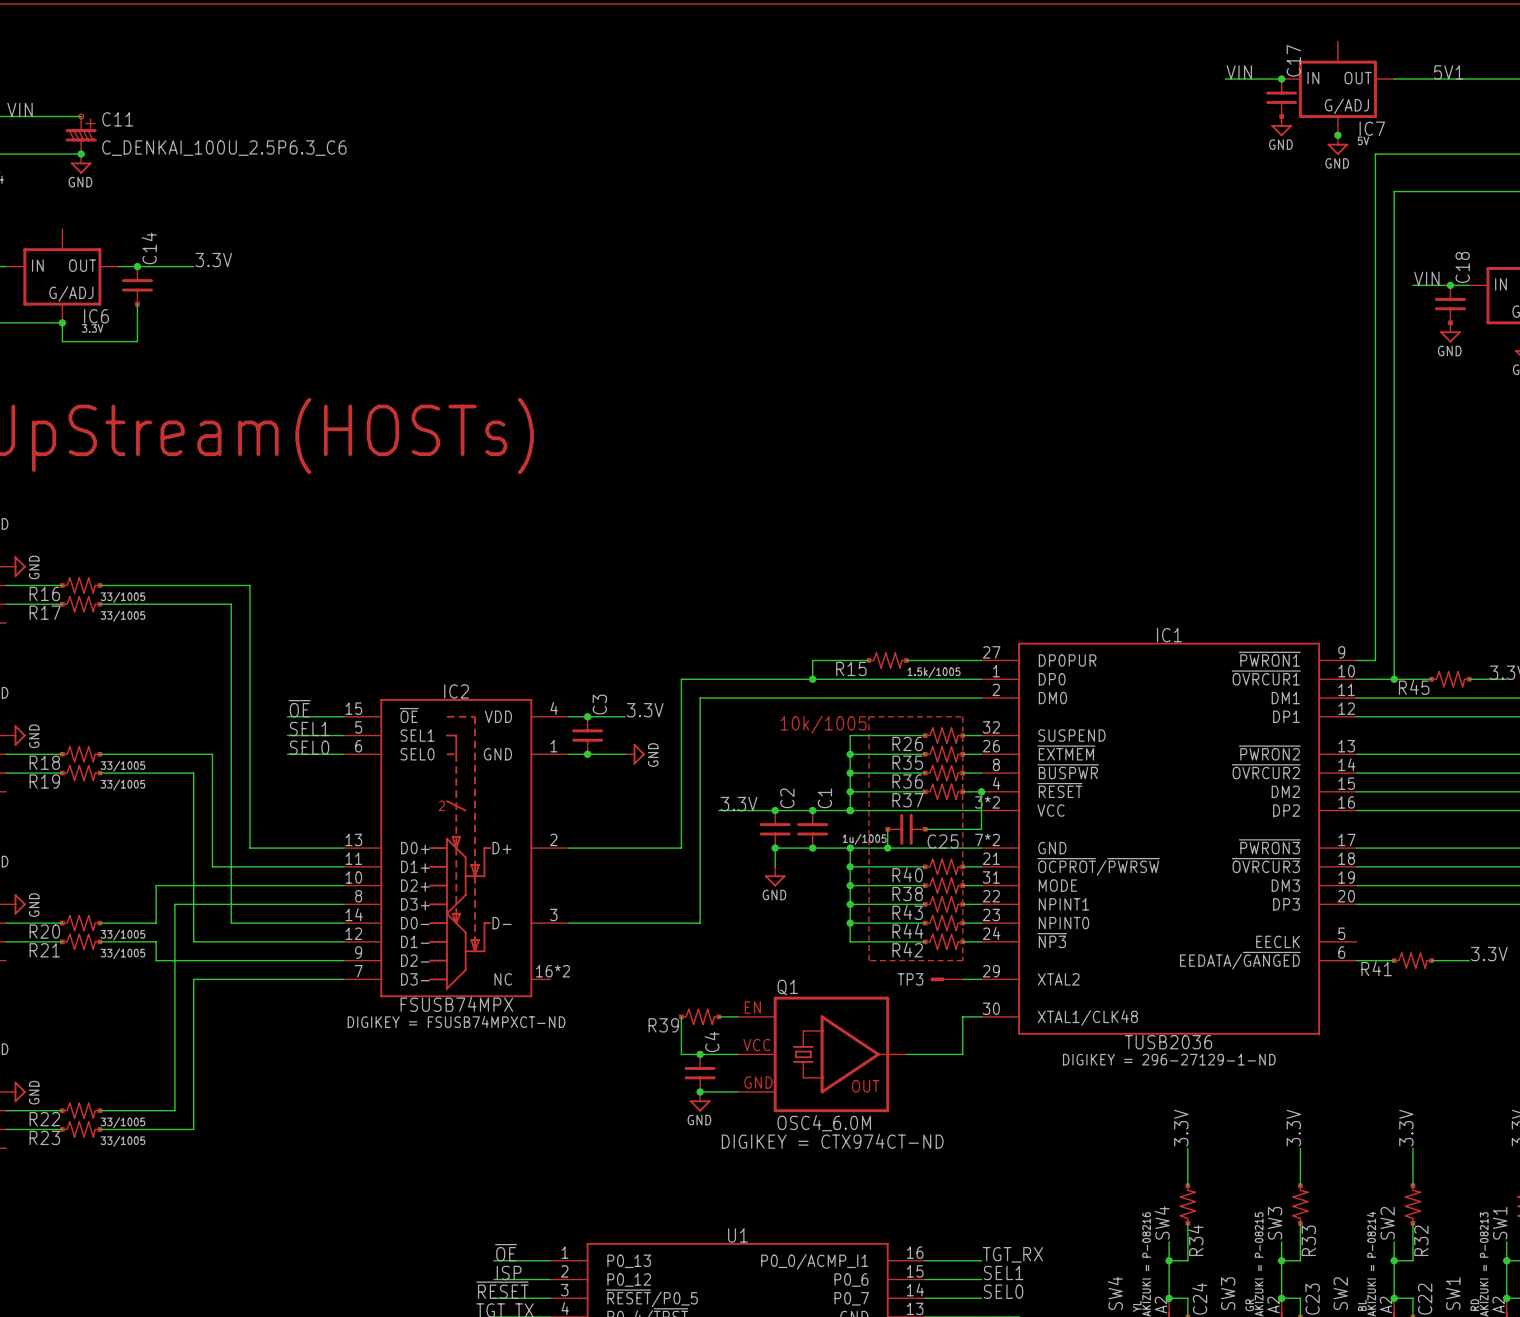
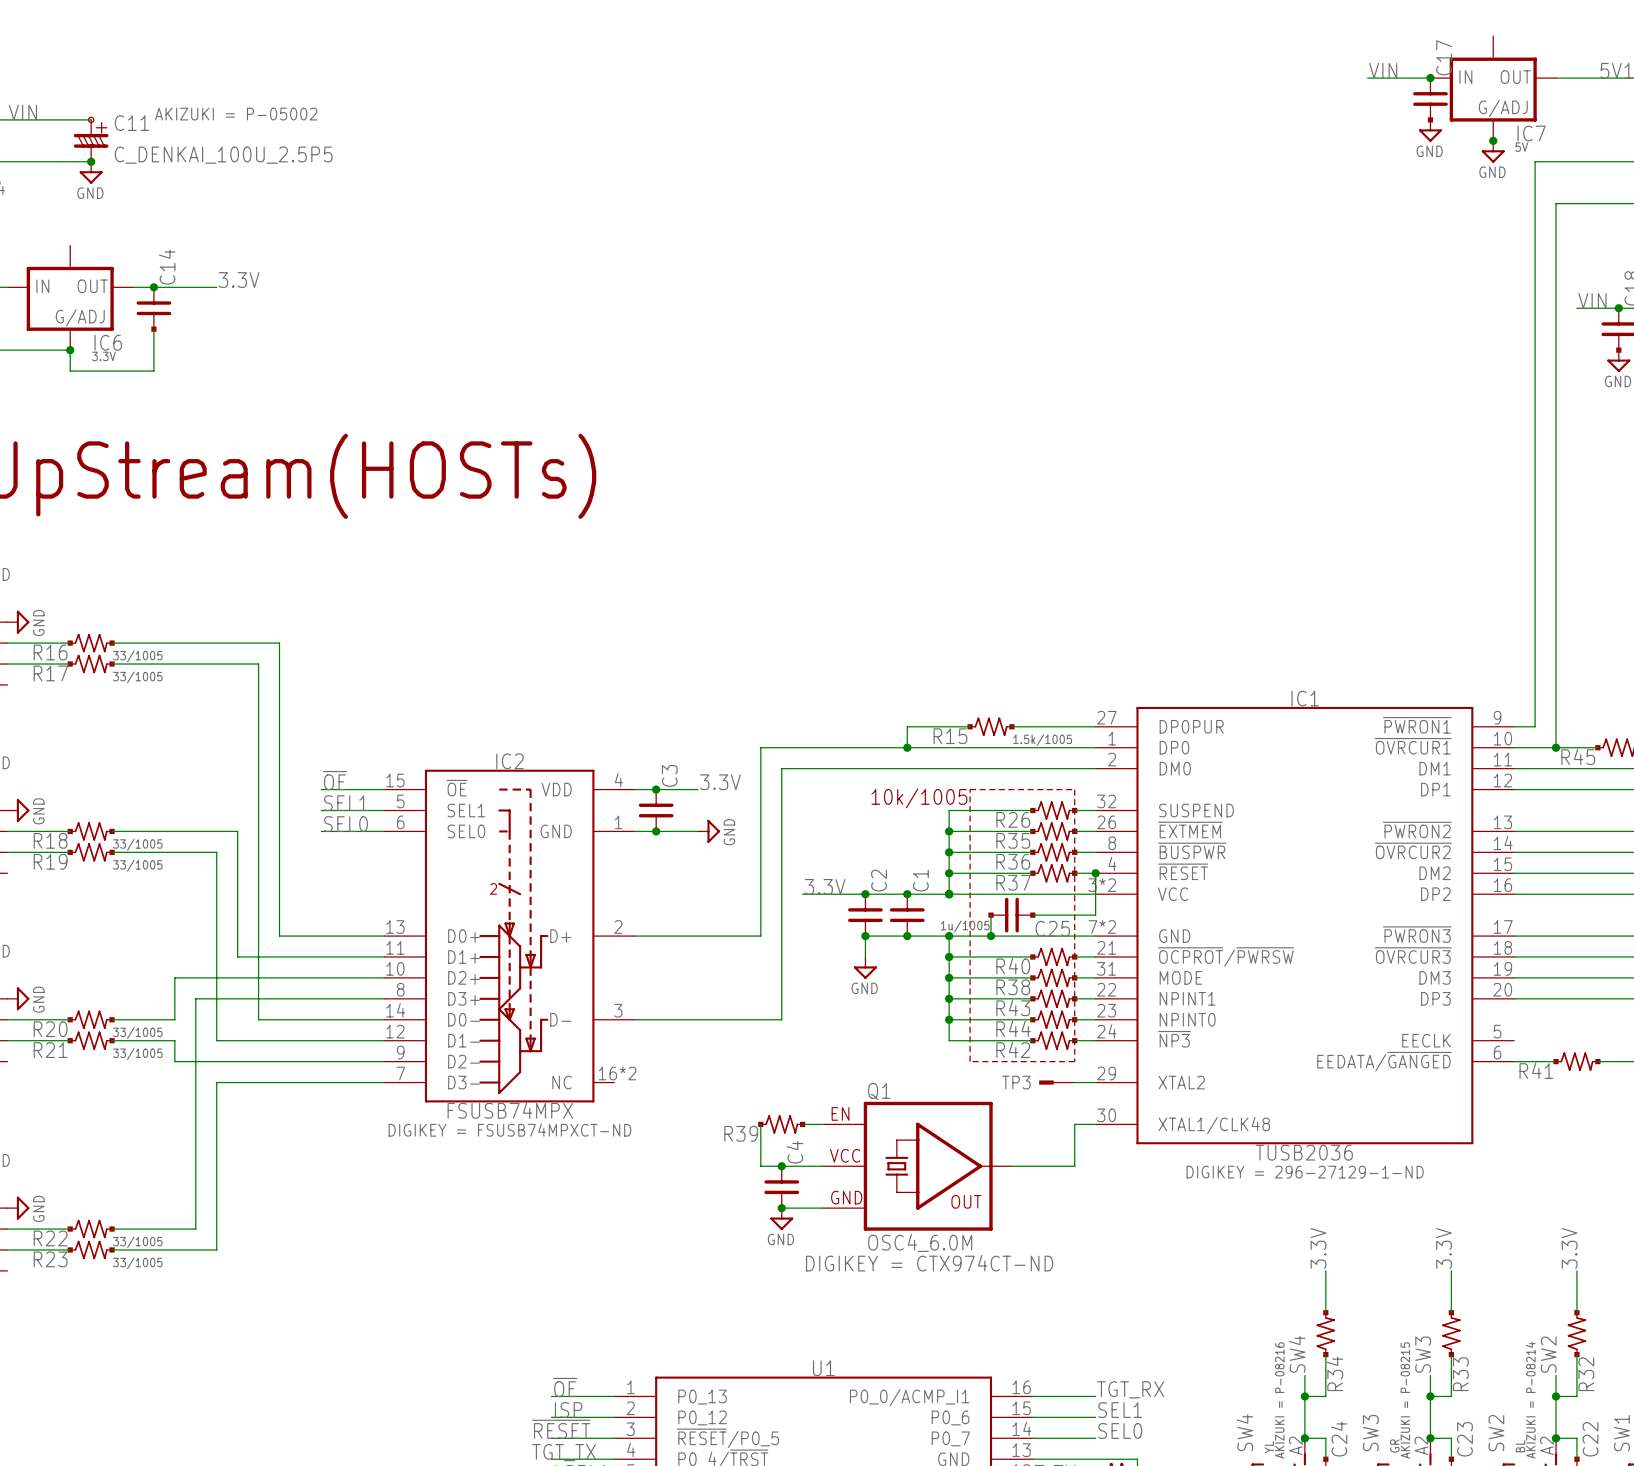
C11 text: none -> AKIZUKI = P-05002 (236, 114)
C11 value: C_DENKAI_100U_2.5P6.3_C6 (224, 148) -> C_DENKAI_100U_2.5P5 (223, 155)

